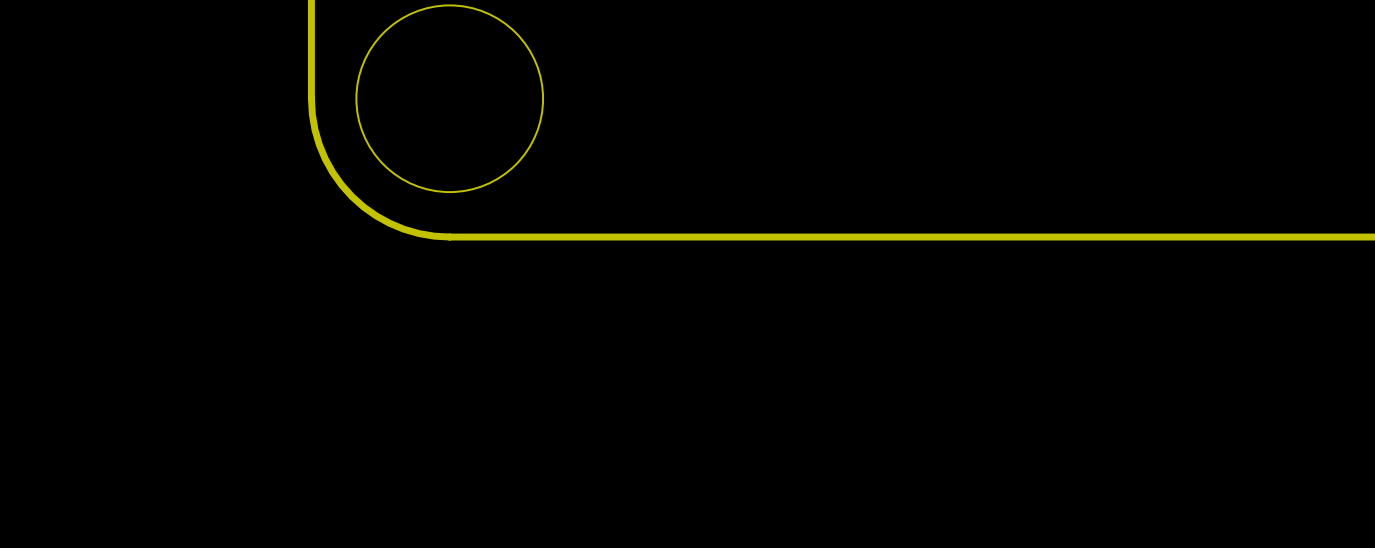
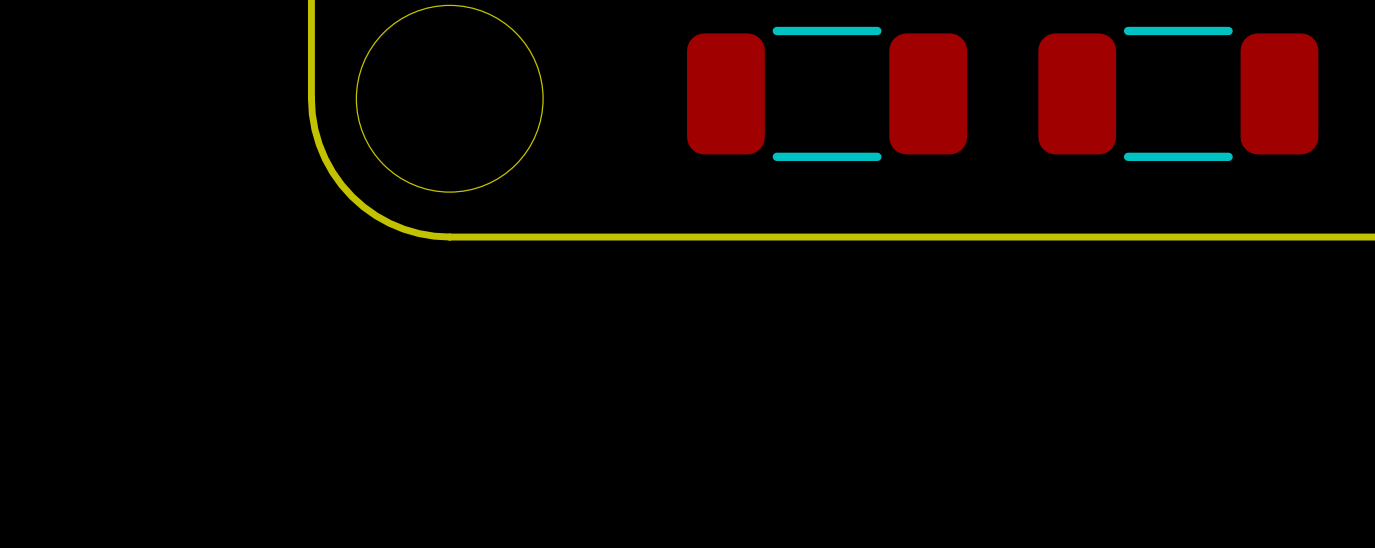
part: none -> (827, 93)
part: none -> (1178, 93)

